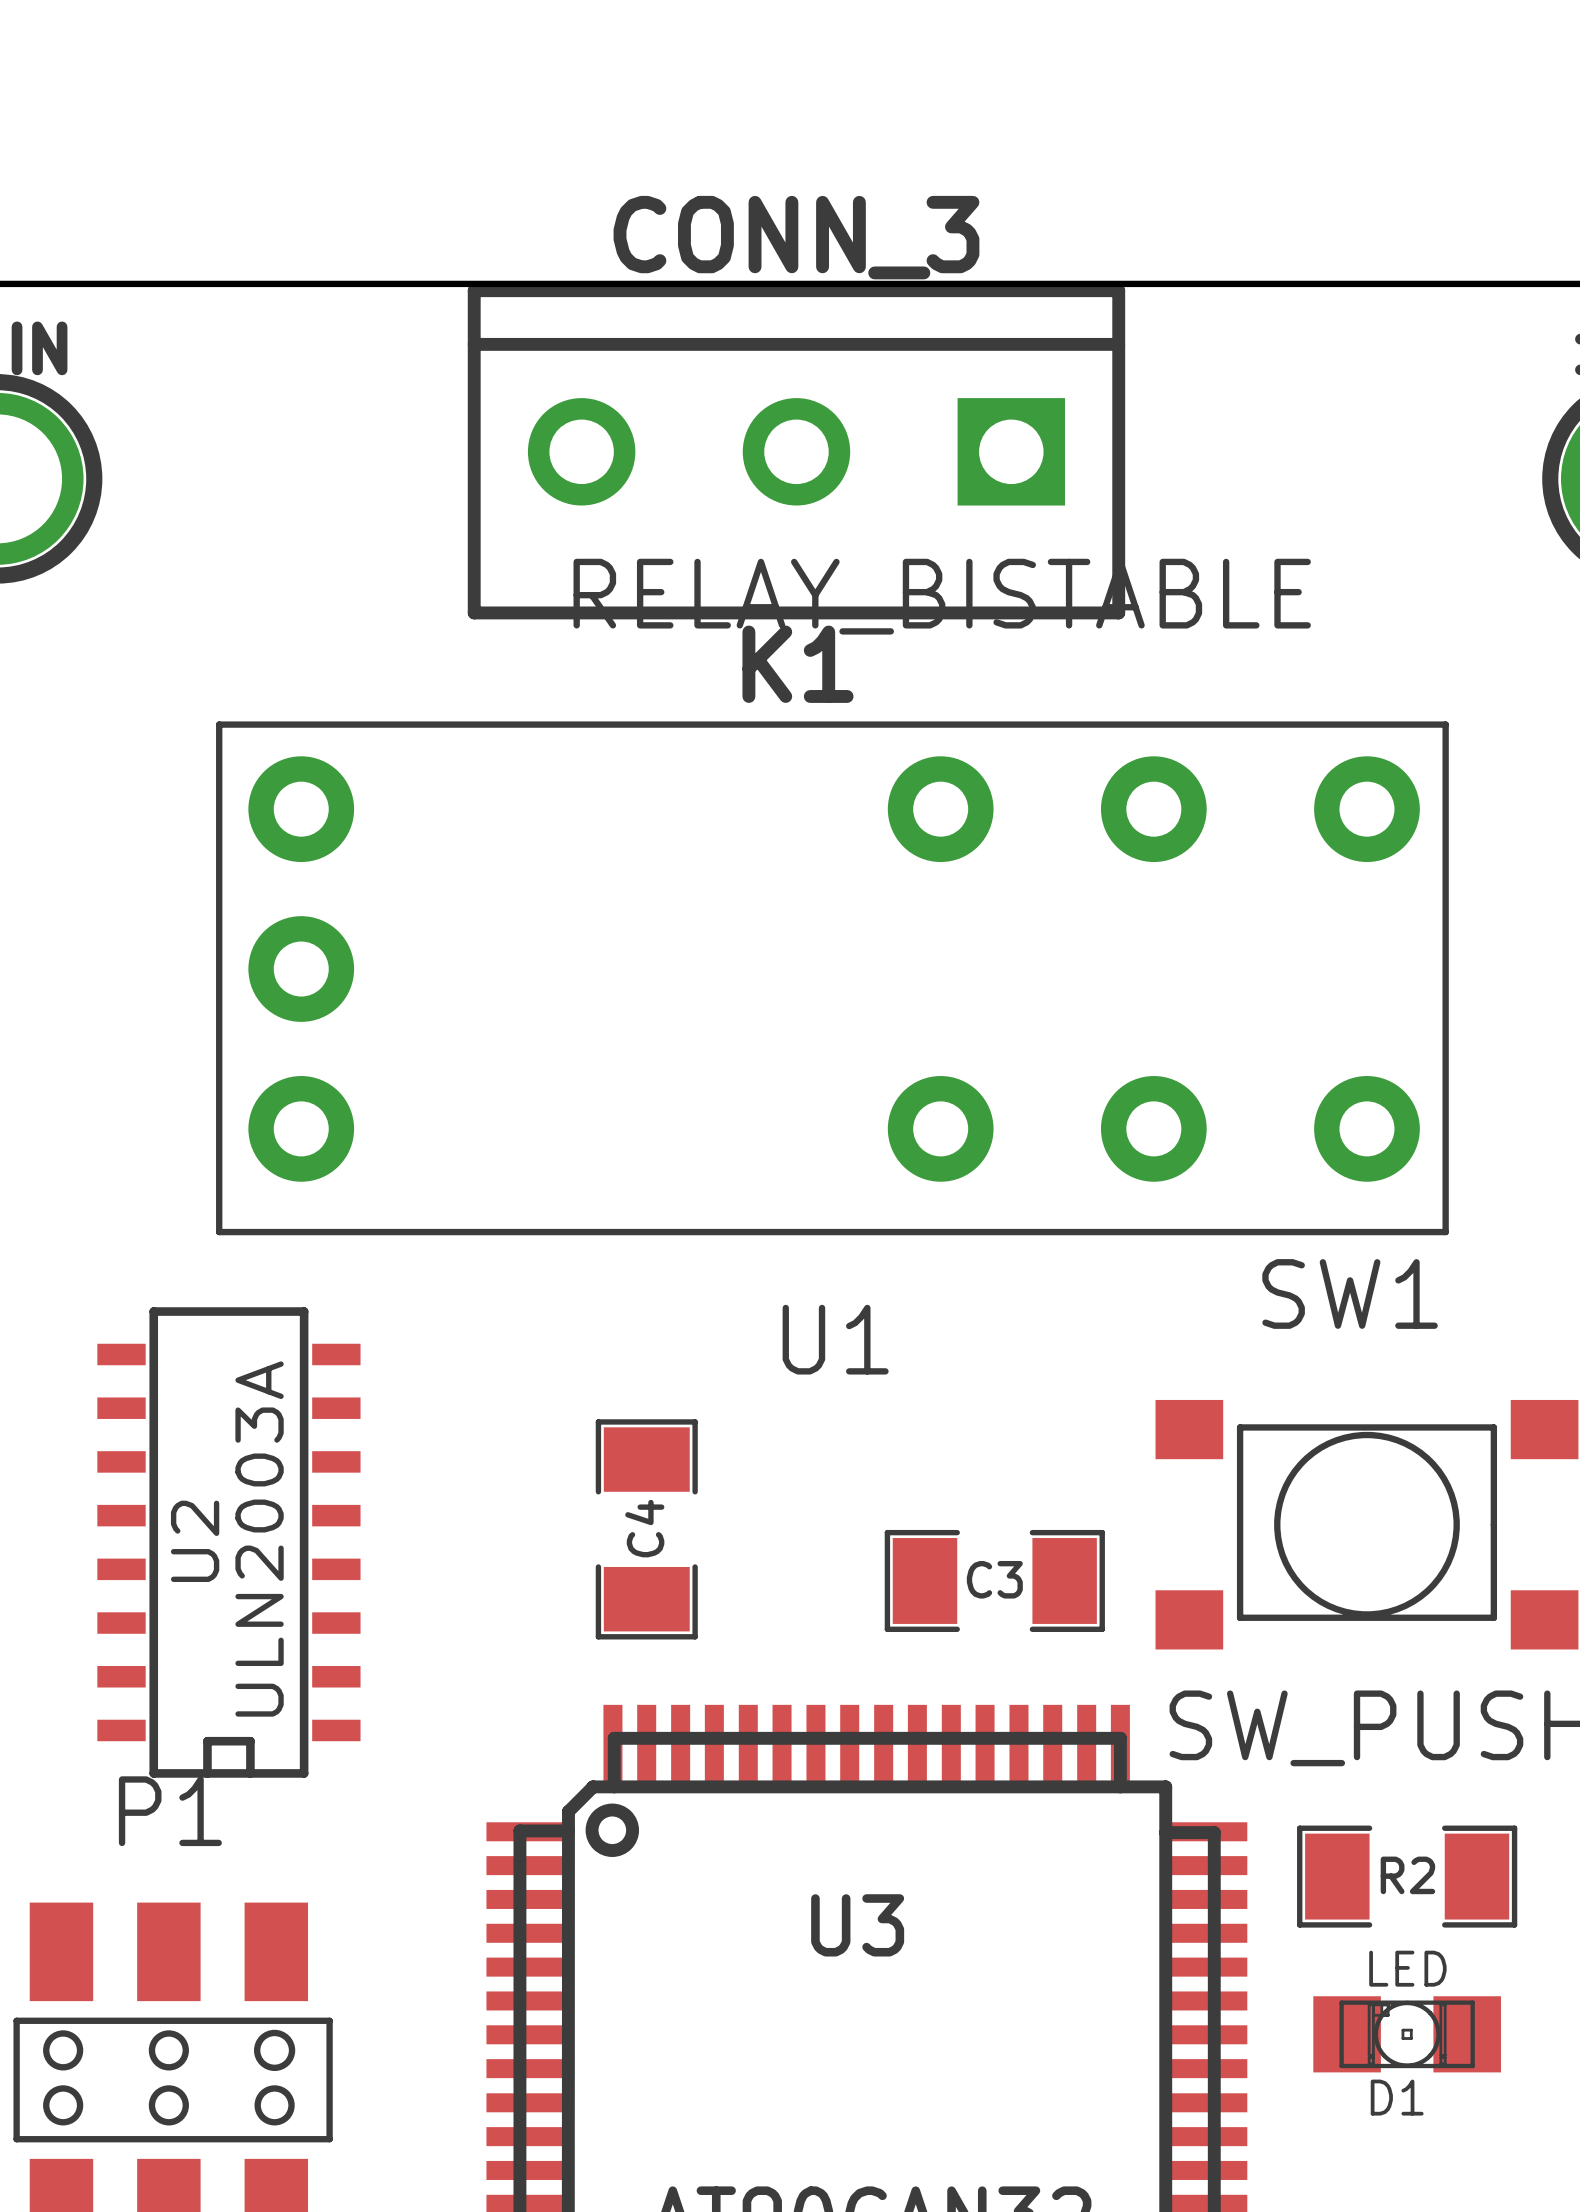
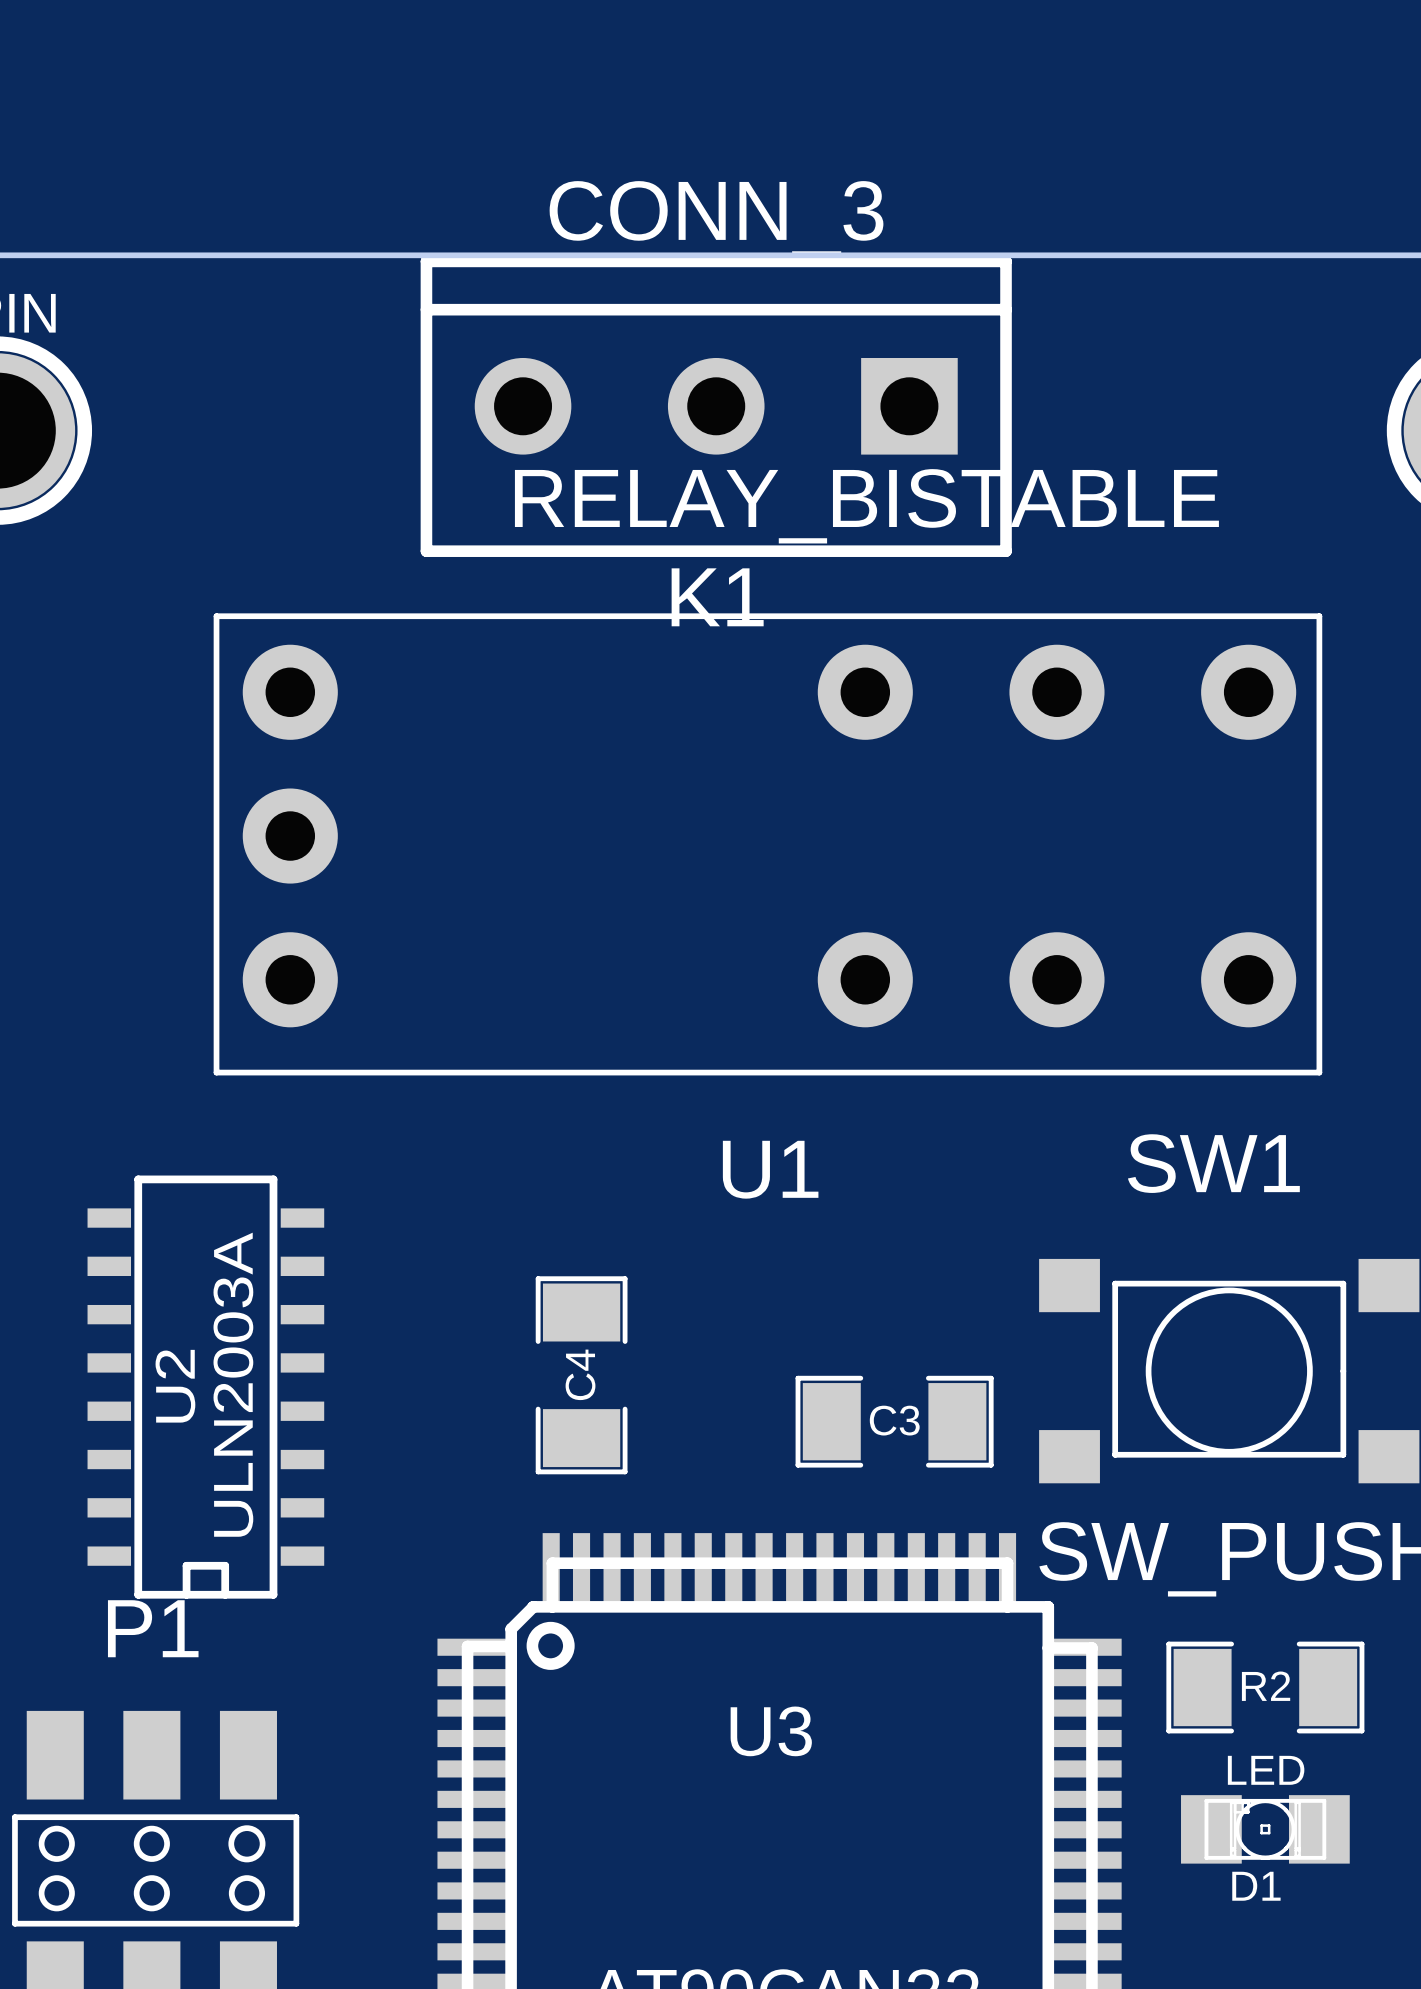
U1 position: (832, 978) -> (767, 844)

